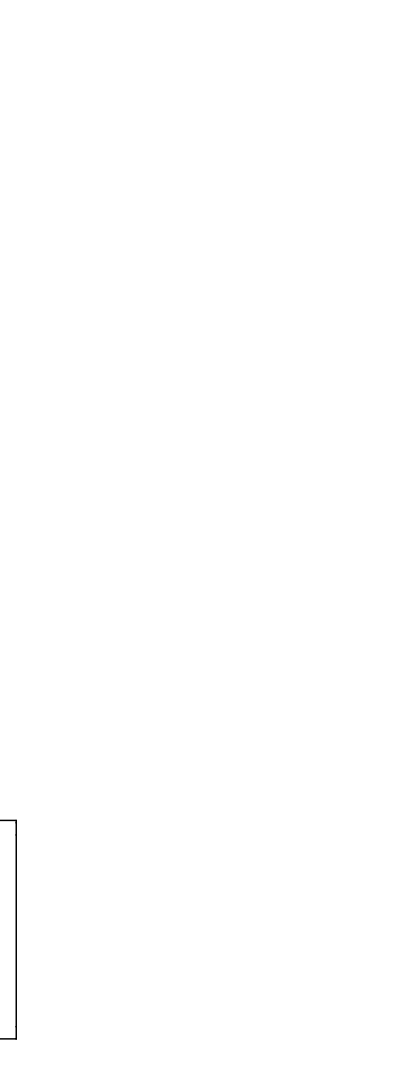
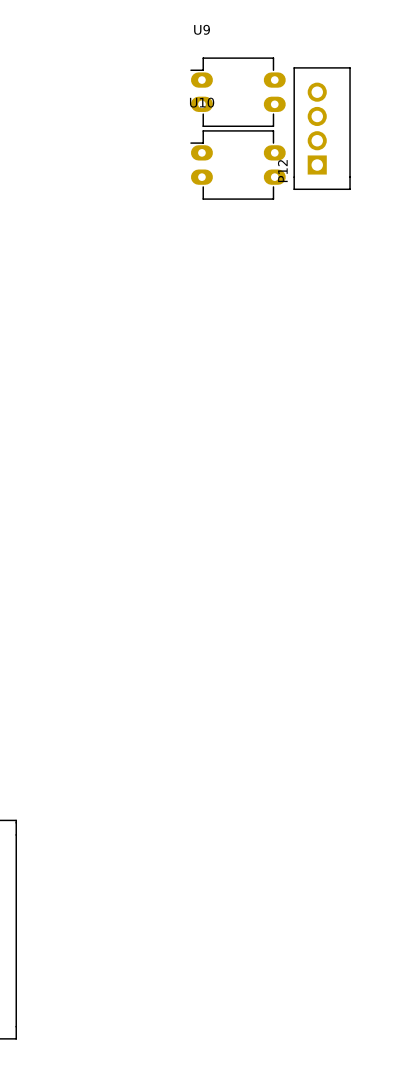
U9: none -> (237, 92)
P12: none -> (322, 128)
U10: none -> (237, 165)

